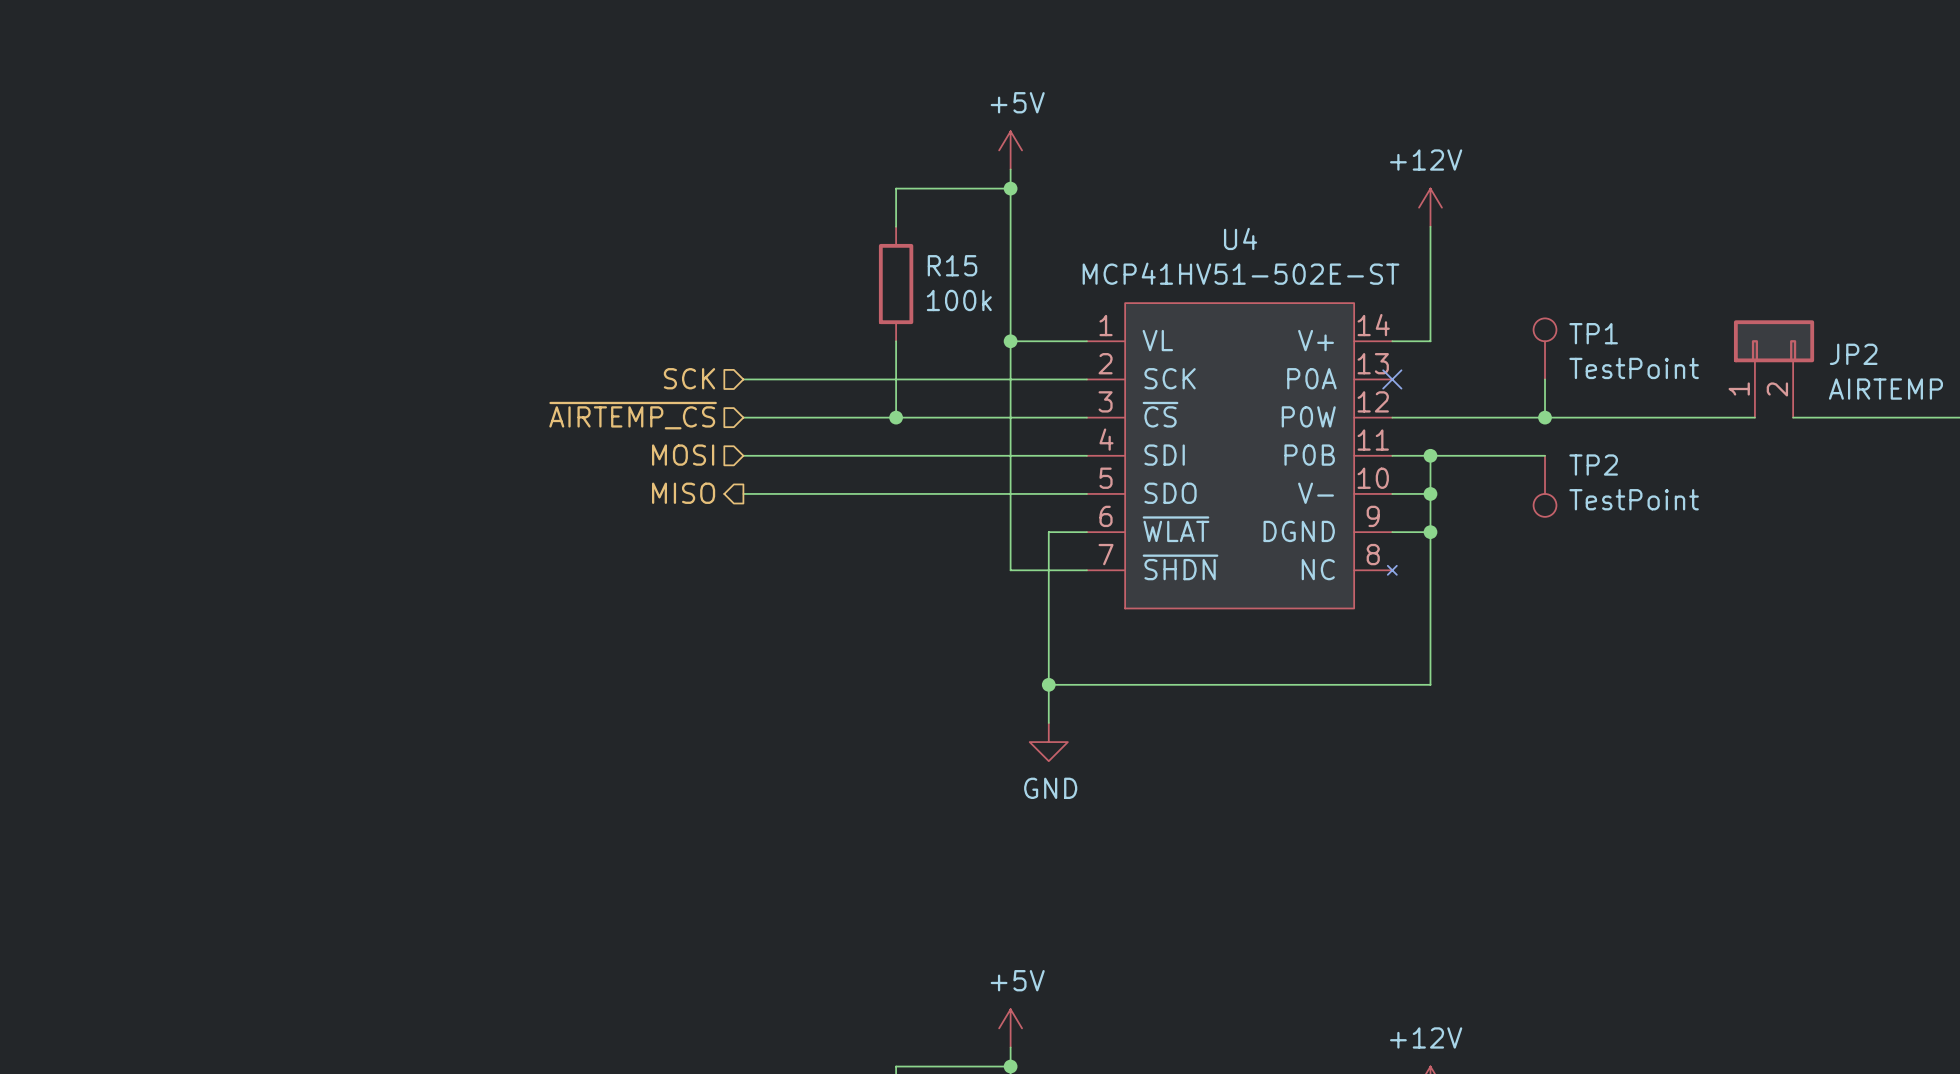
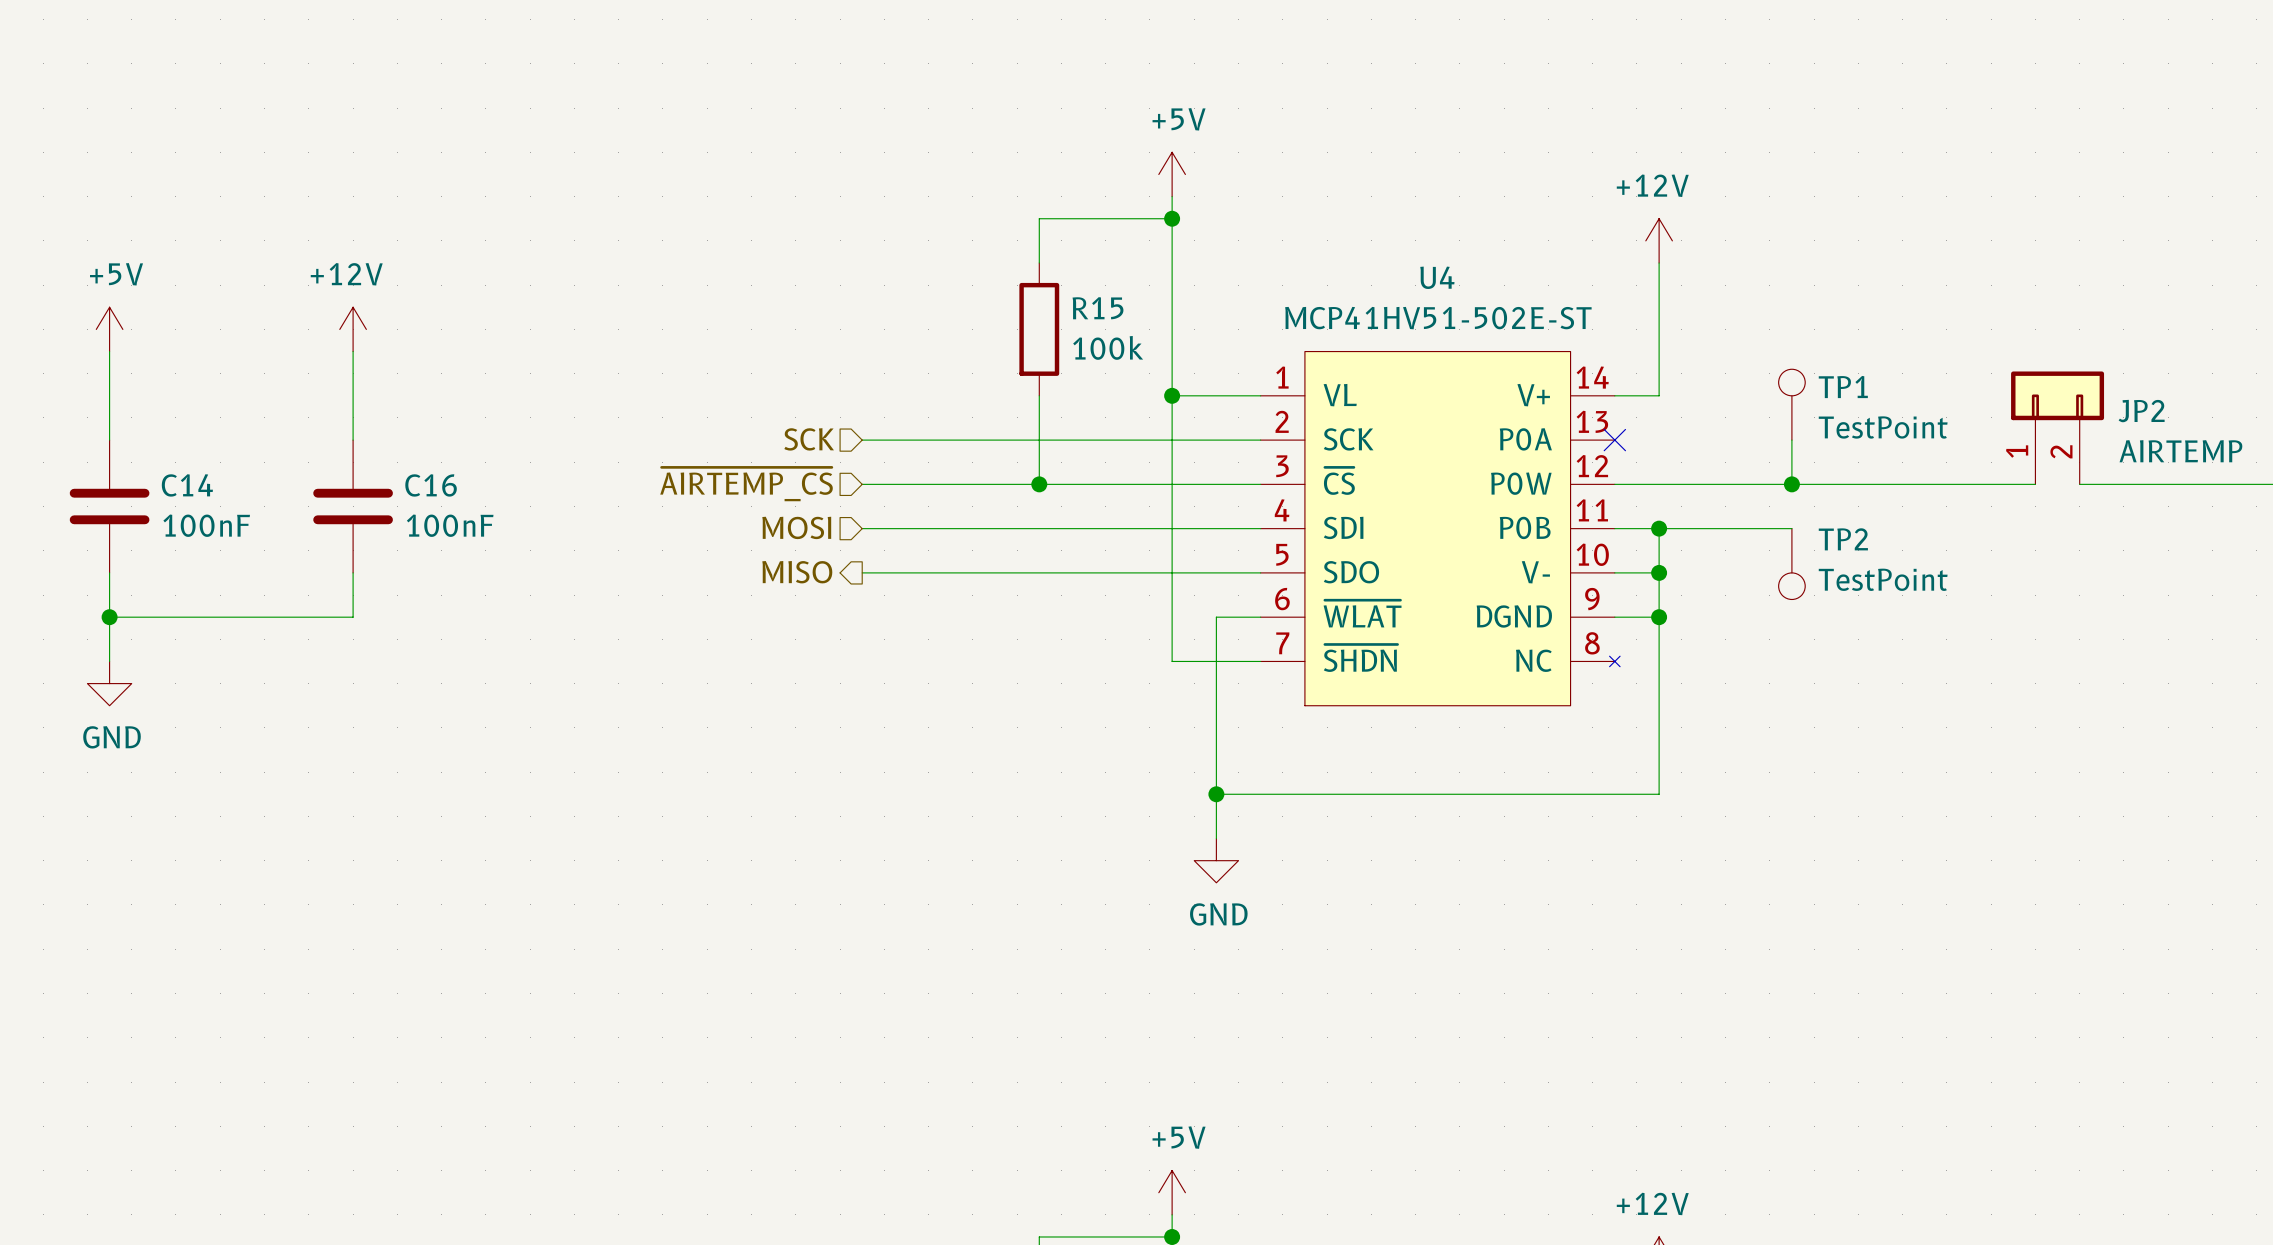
power symbol: none -> +5V (109, 329)
power symbol: none -> +12V (353, 329)
wire: none -> (109, 351) (109, 440)
wire: none -> (353, 351) (353, 440)
C14: none -> 100nF (109, 506)
C16: none -> 100nF (353, 506)
wire: none -> (109, 572) (109, 661)
wire: none -> (353, 572) (353, 617) (109, 617)
junction: none -> (109, 617)
power symbol: none -> GND (109, 683)

